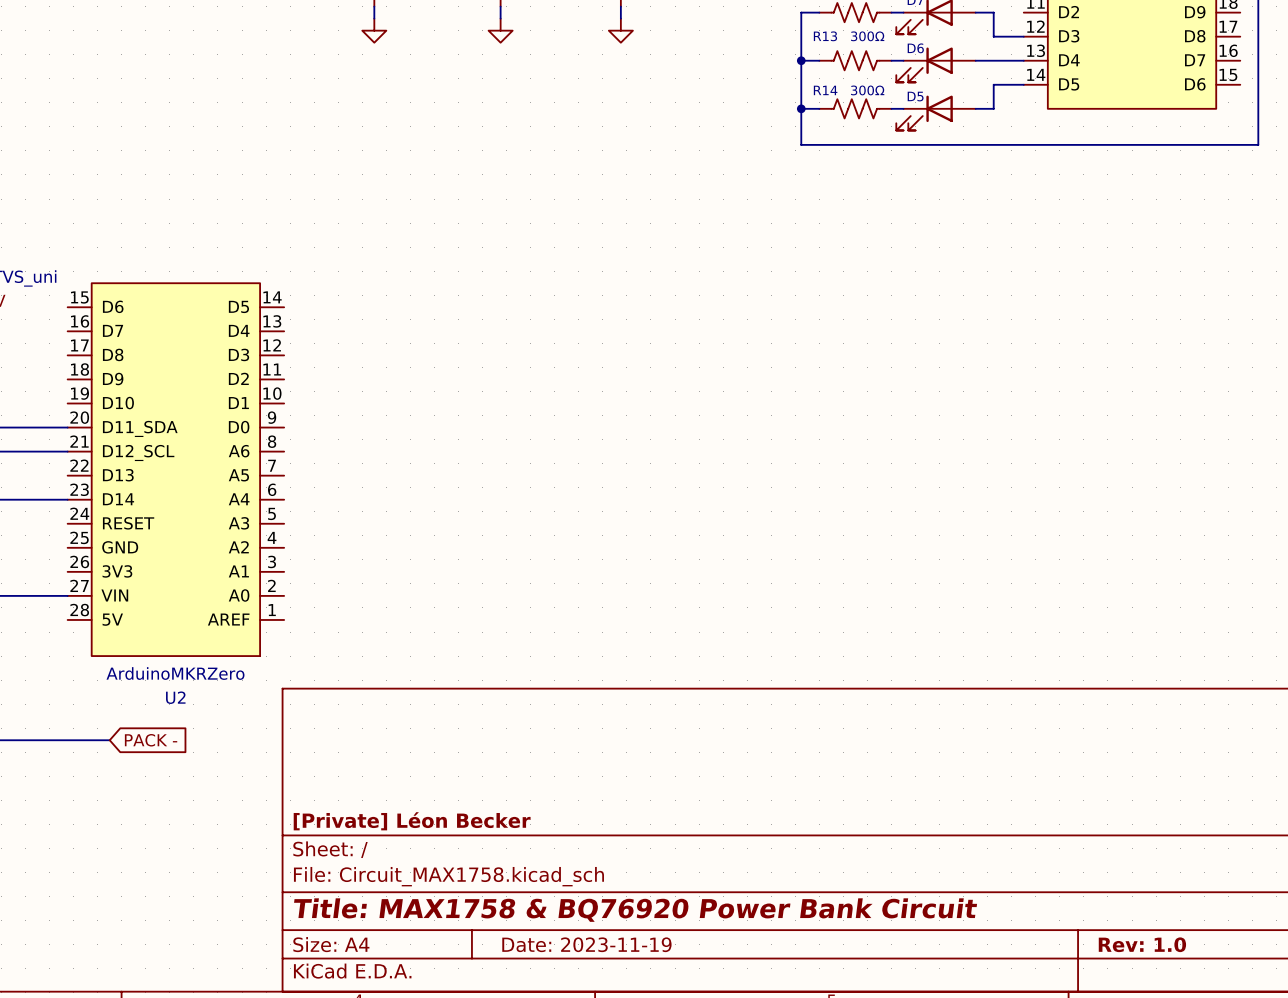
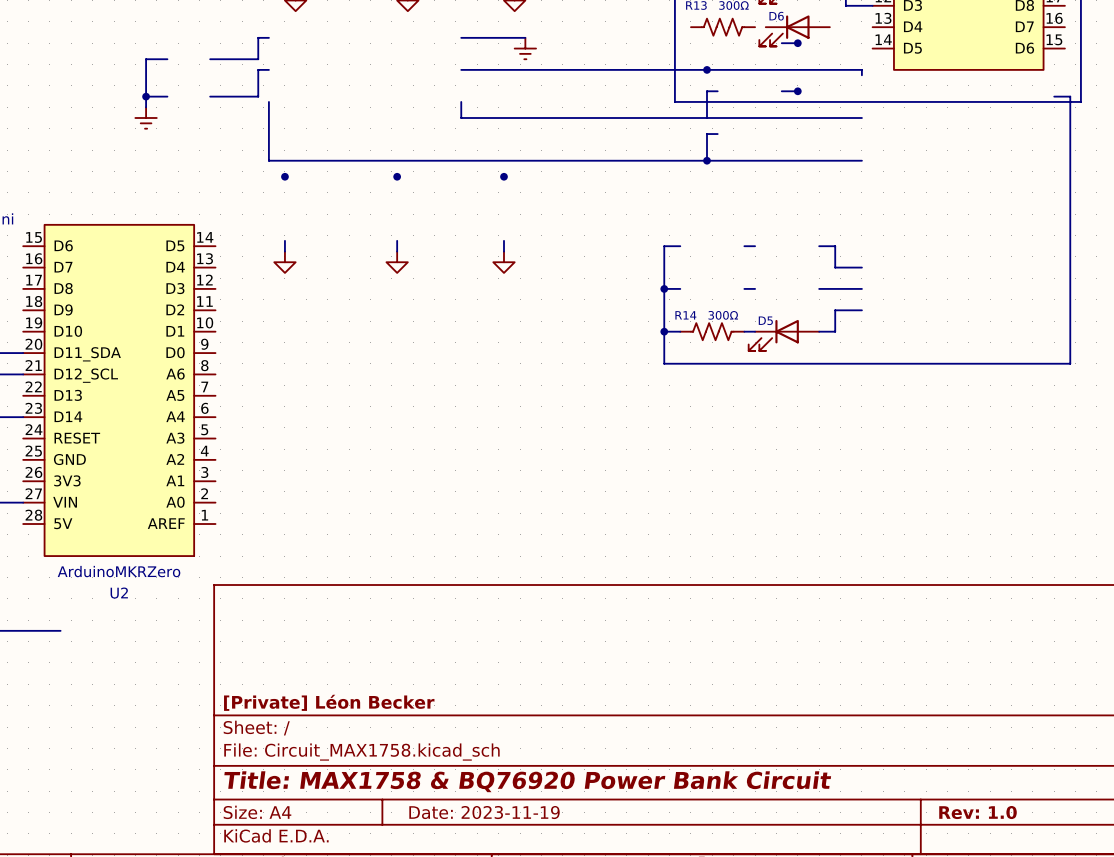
wire: (801, 60) (819, 60) -> (781, 43) (797, 43)
junction: (801, 60) -> none
wire: (891, 60) (903, 60) -> none
wire: (975, 60) (1023, 60) -> none
wire: none -> (268, 37) (258, 37) (258, 59) (210, 59)
wire: none -> (461, 37) (525, 37)
junction: none -> (797, 43)
power symbol: none -> (525, 48)
wire: (1023, 84) (993, 84) (993, 108) -> (861, 75) (861, 69) (845, 69)
wire: none -> (167, 59) (146, 59) (146, 107)
wire: none -> (268, 69) (258, 69) (258, 96) (210, 96)
wire: none -> (461, 69) (674, 69)
junction: (801, 108) -> none
junction: none -> (707, 69)
R14 position: (855, 108) -> (712, 331)
D5 position: (935, 113) -> (783, 335)
wire: none -> (717, 91) (707, 91) (707, 118)
wire: none -> (781, 91) (797, 91)
junction: none -> (797, 91)
wire: none -> (146, 96) (167, 96)
junction: none -> (146, 96)
wire: none -> (1054, 96) (1070, 96) (1070, 363) (664, 363) (664, 246) (680, 246)
wire: none -> (268, 101) (268, 160) (861, 160)
wire: none -> (461, 101) (461, 118) (861, 118)
power symbol: none -> (146, 118)
wire: none -> (717, 134) (707, 134) (707, 160)
junction: none -> (707, 160)
junction: none -> (284, 176)
junction: none -> (397, 176)
junction: none -> (503, 176)
wire: none -> (284, 240) (284, 251)
wire: none -> (397, 240) (397, 251)
wire: none -> (503, 240) (503, 251)
wire: none -> (744, 246) (755, 246)
wire: none -> (819, 246) (835, 246) (835, 267) (861, 267)
power symbol: none -> (284, 262)
power symbol: none -> (397, 262)
power symbol: none -> (503, 262)
wire: none -> (664, 288) (680, 288)
junction: none -> (664, 288)
wire: none -> (744, 288) (755, 288)
wire: none -> (819, 288) (861, 288)
wire: none -> (861, 310) (835, 310) (835, 331) (819, 331)
wire: none -> (664, 331) (680, 331)
junction: none -> (664, 331)
wire: none -> (744, 331) (755, 331)
global label: PACK - (151, 740) -> none

